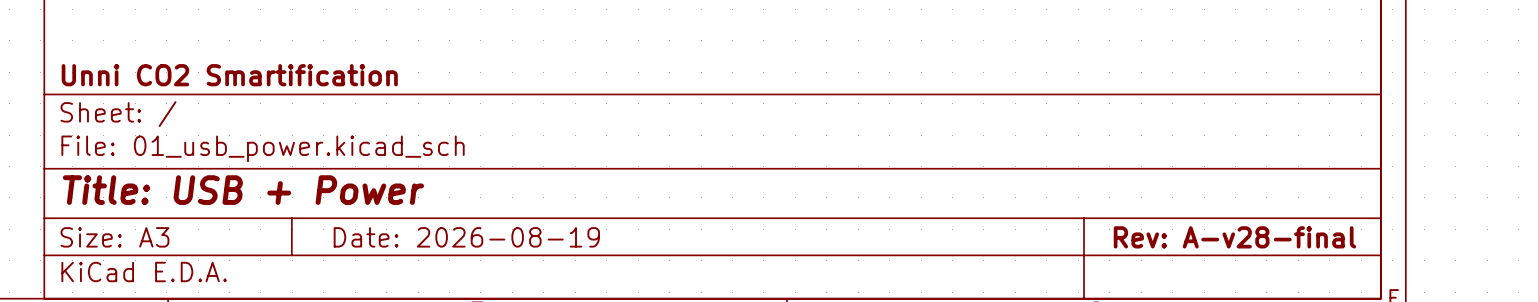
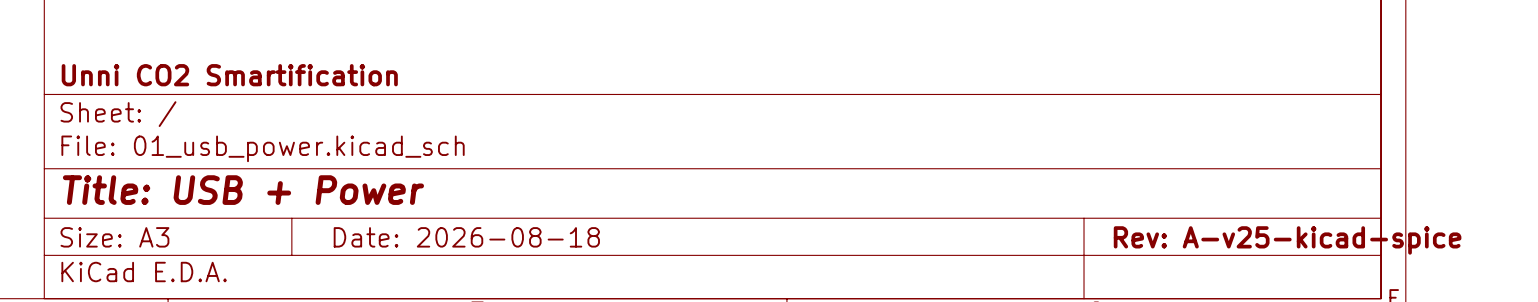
title block: Date: 2026-08-19 (466, 237) -> Date: 2026-08-18 (466, 237)
title block: Rev: A-v28-final (1234, 237) -> Rev: A-v25-kicad-spice (1287, 240)

